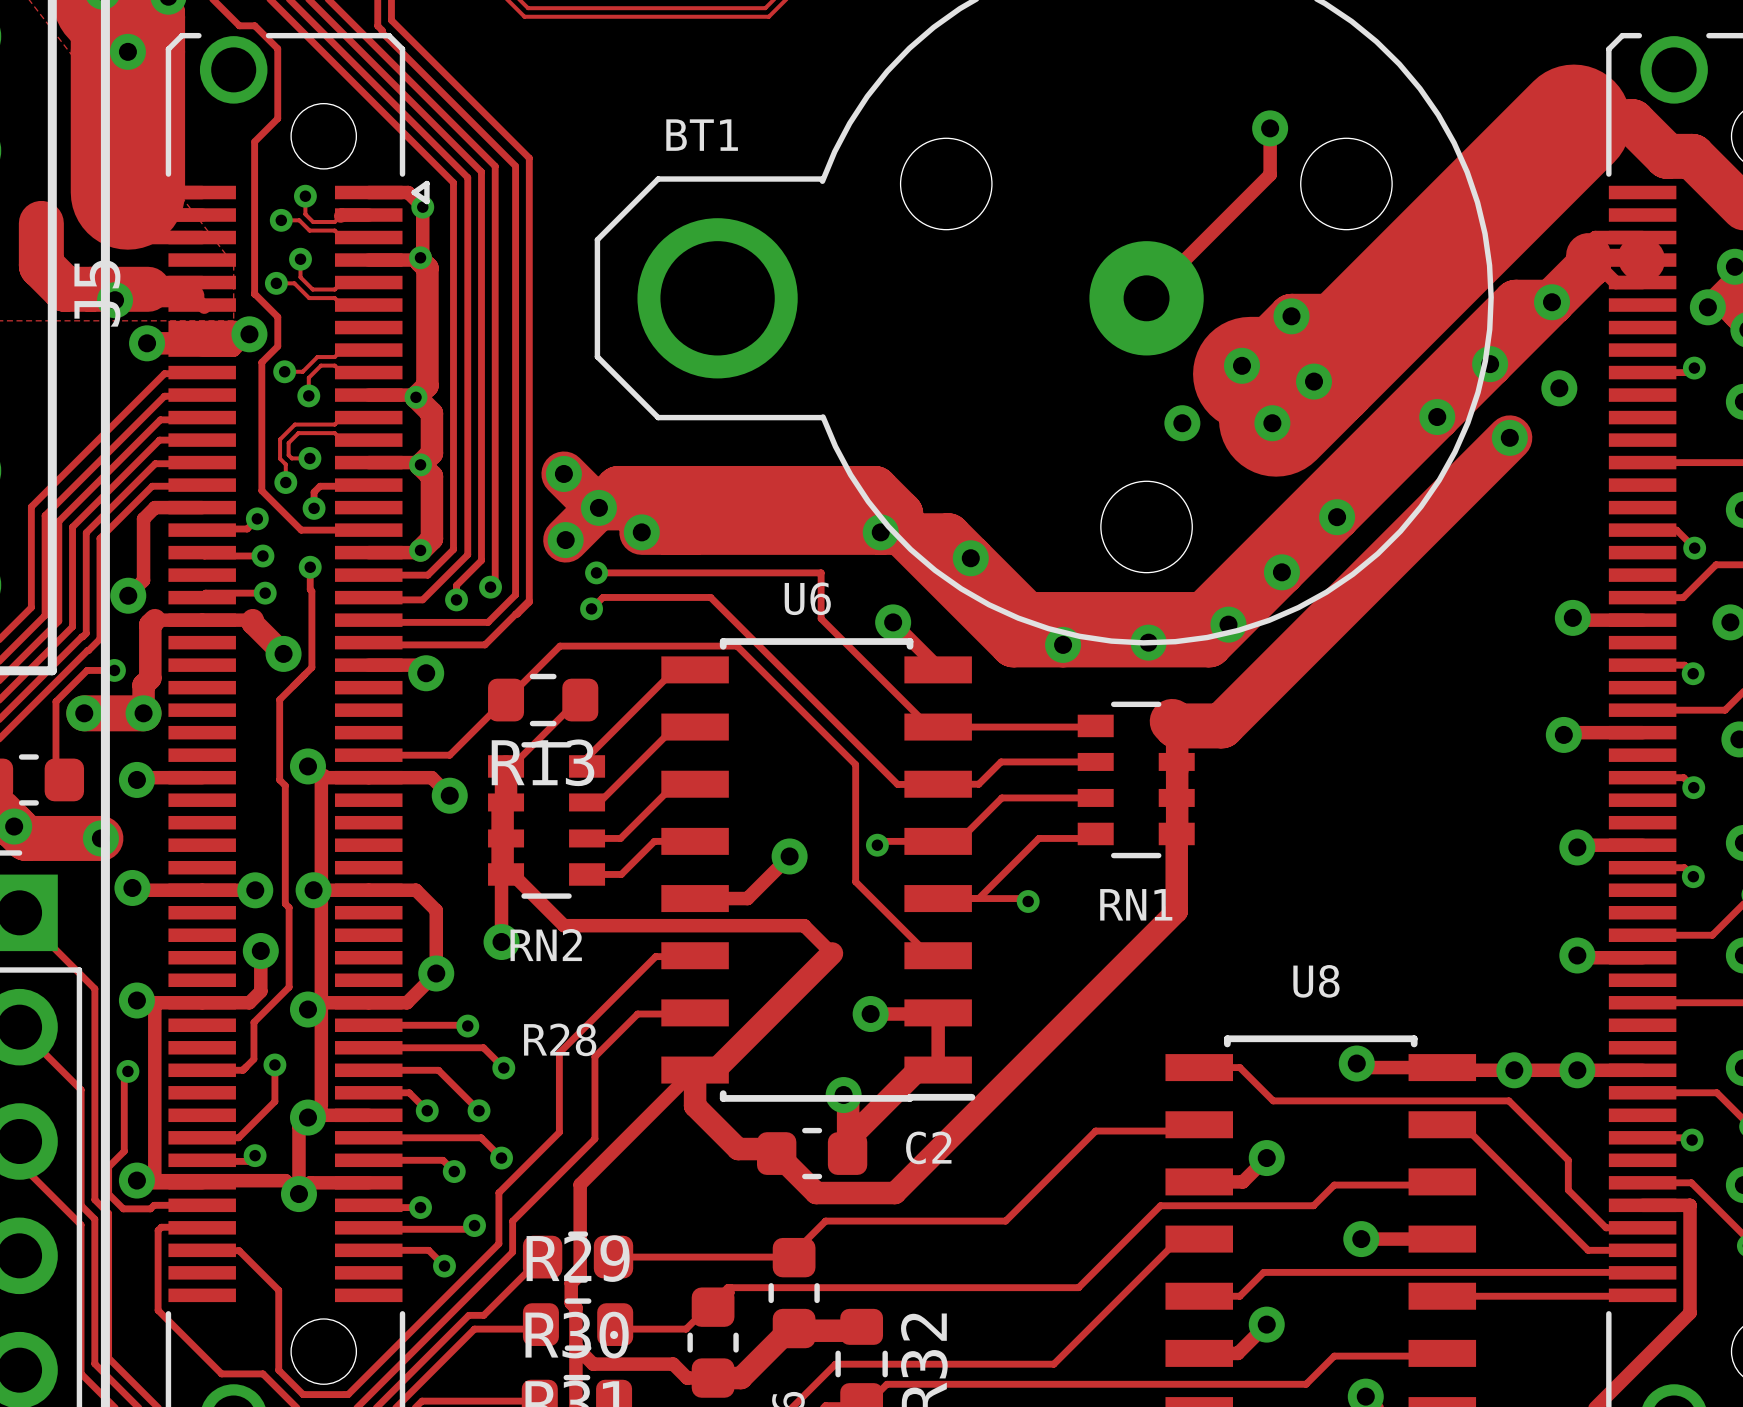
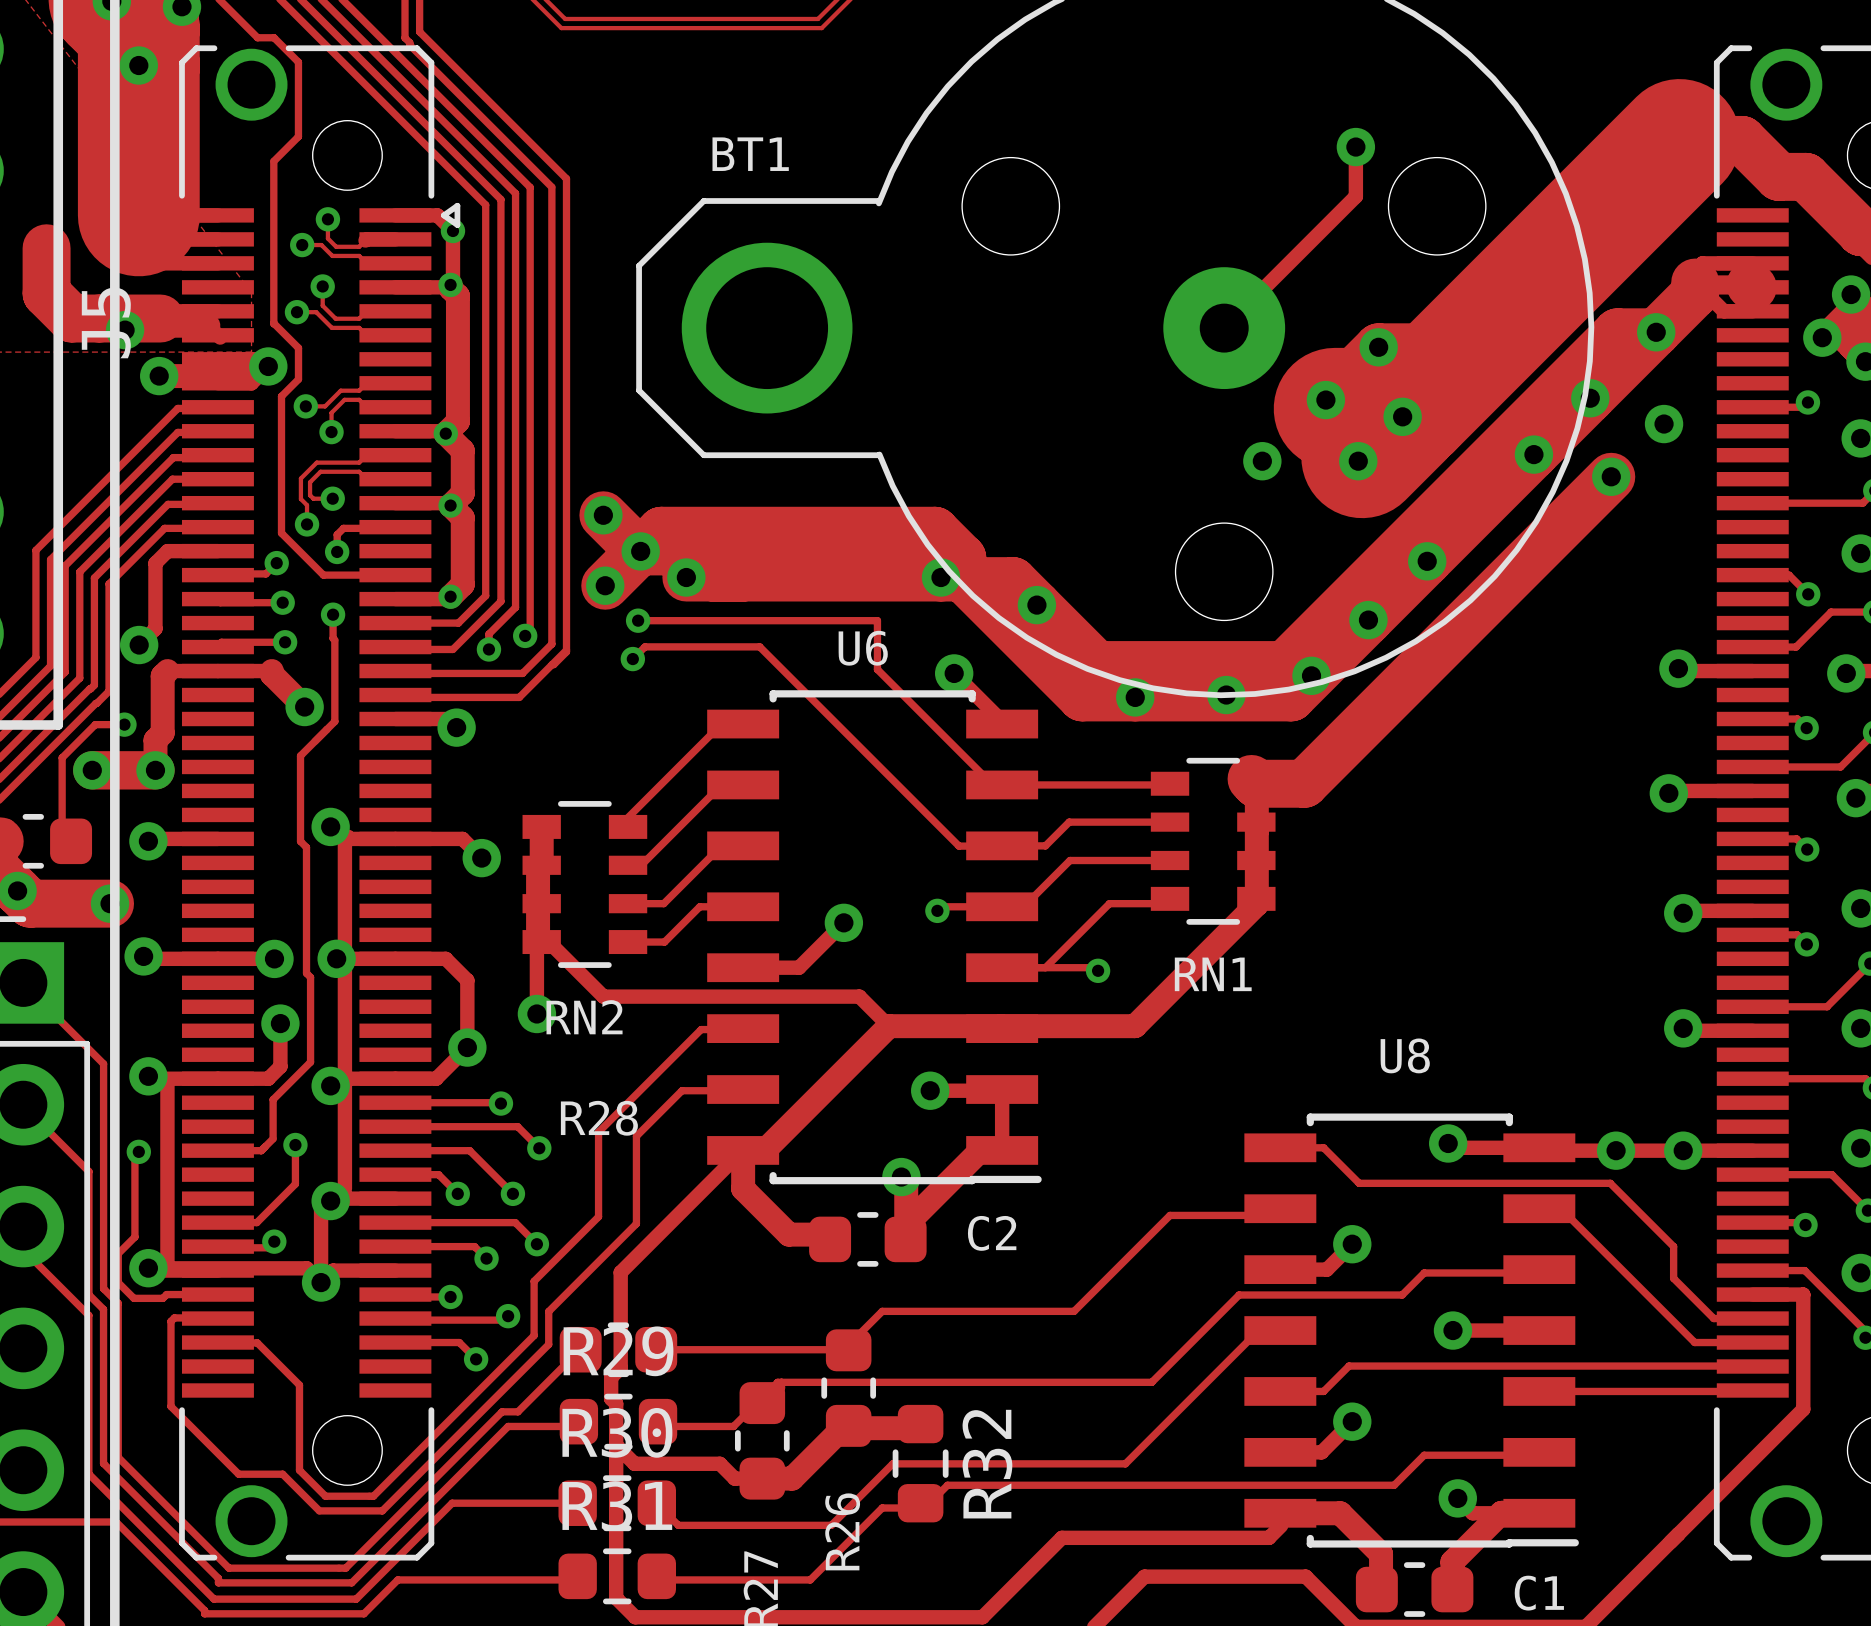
track: (581, 696) (511, 766) (506, 766) -> none
track: (506, 698) (449, 755) (368, 755) -> none
track: (506, 700) (559, 646) (737, 646) (855, 764) (855, 881) (929, 955) (937, 955) -> none
R13: (543, 700) -> none
track: (1176, 830) (1176, 911) (895, 1193) (816, 1193) (776, 1153) -> none
track: none -> (1256, 904) (1135, 1026) (889, 1026)

